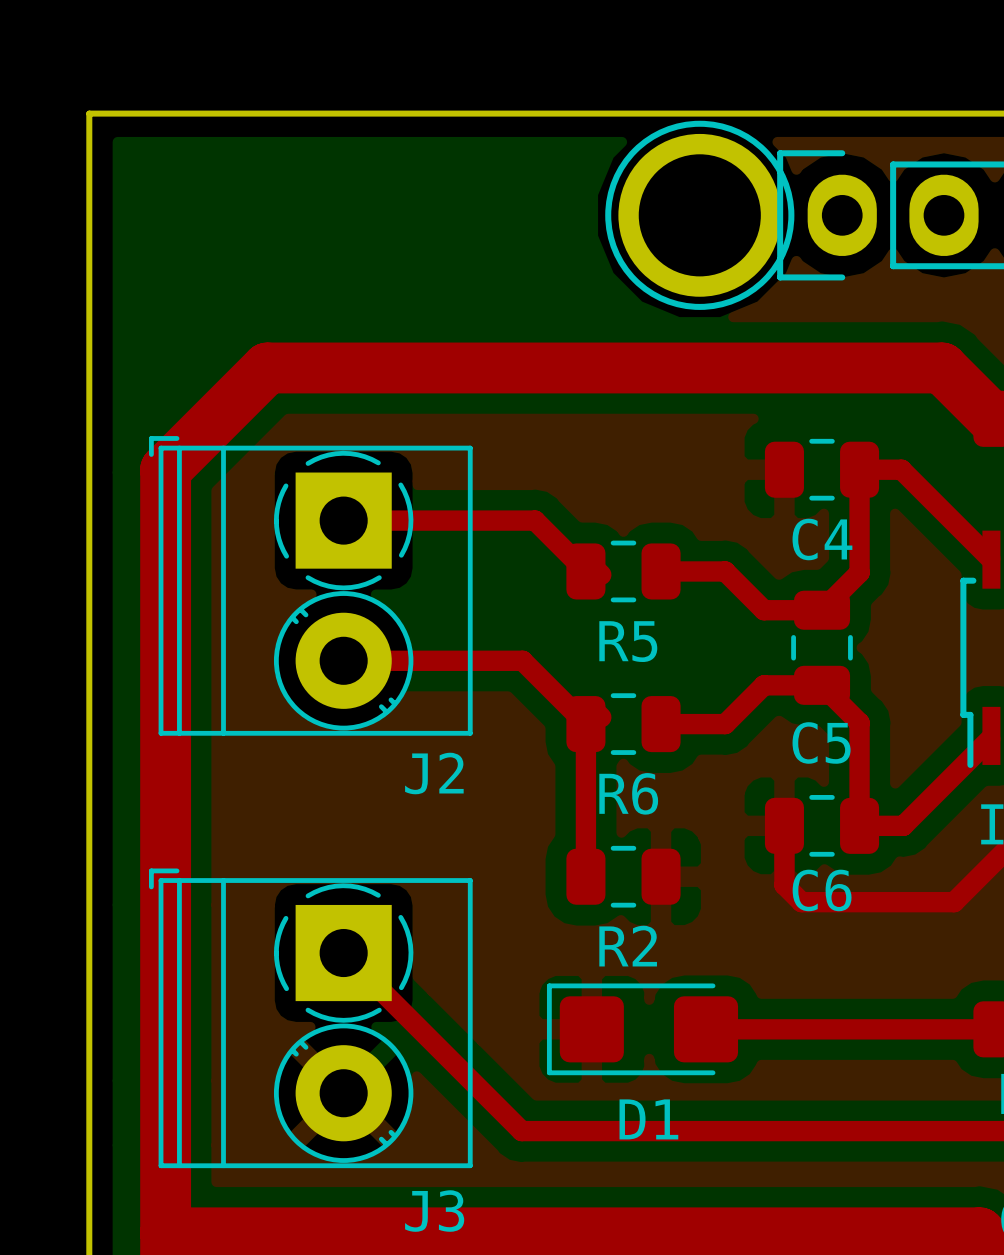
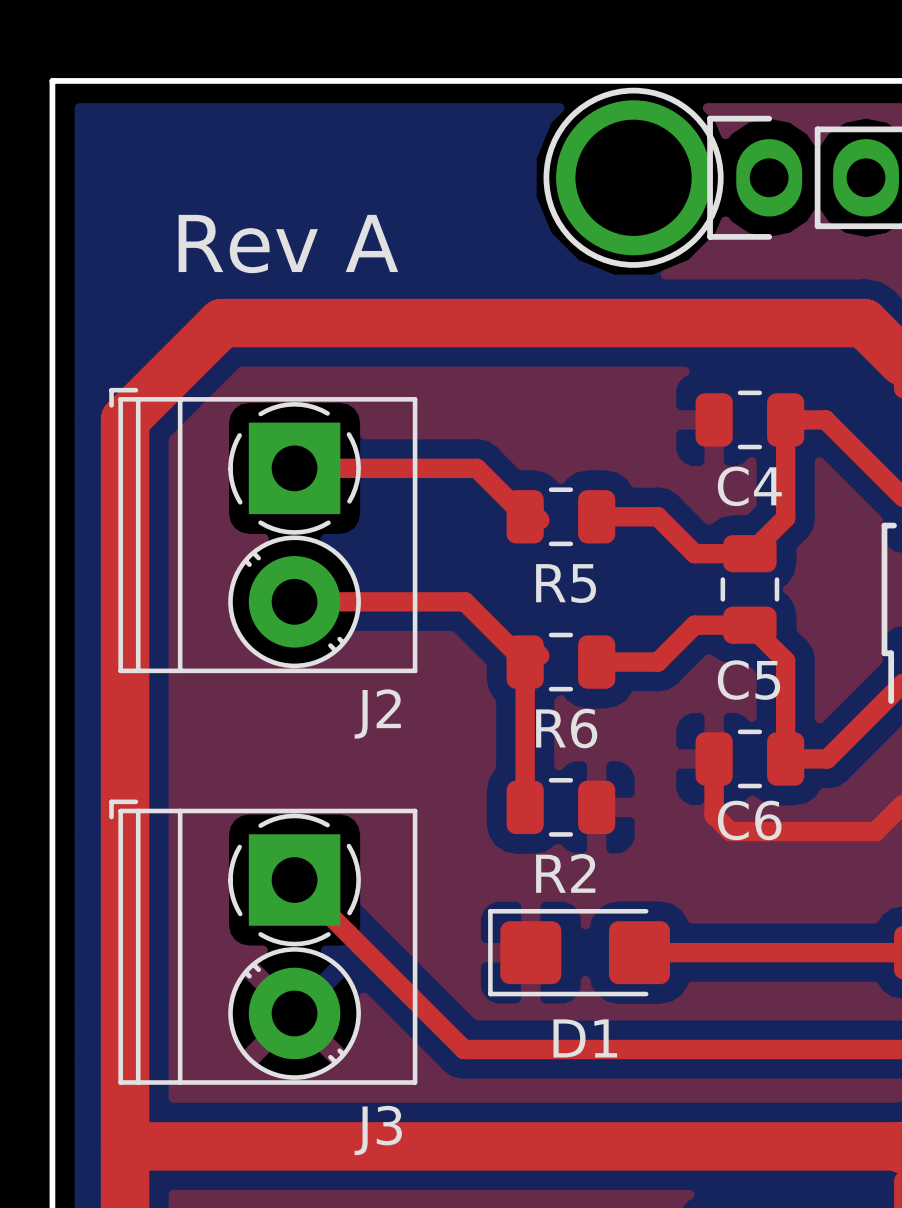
text: none -> Rev A (288, 244)

